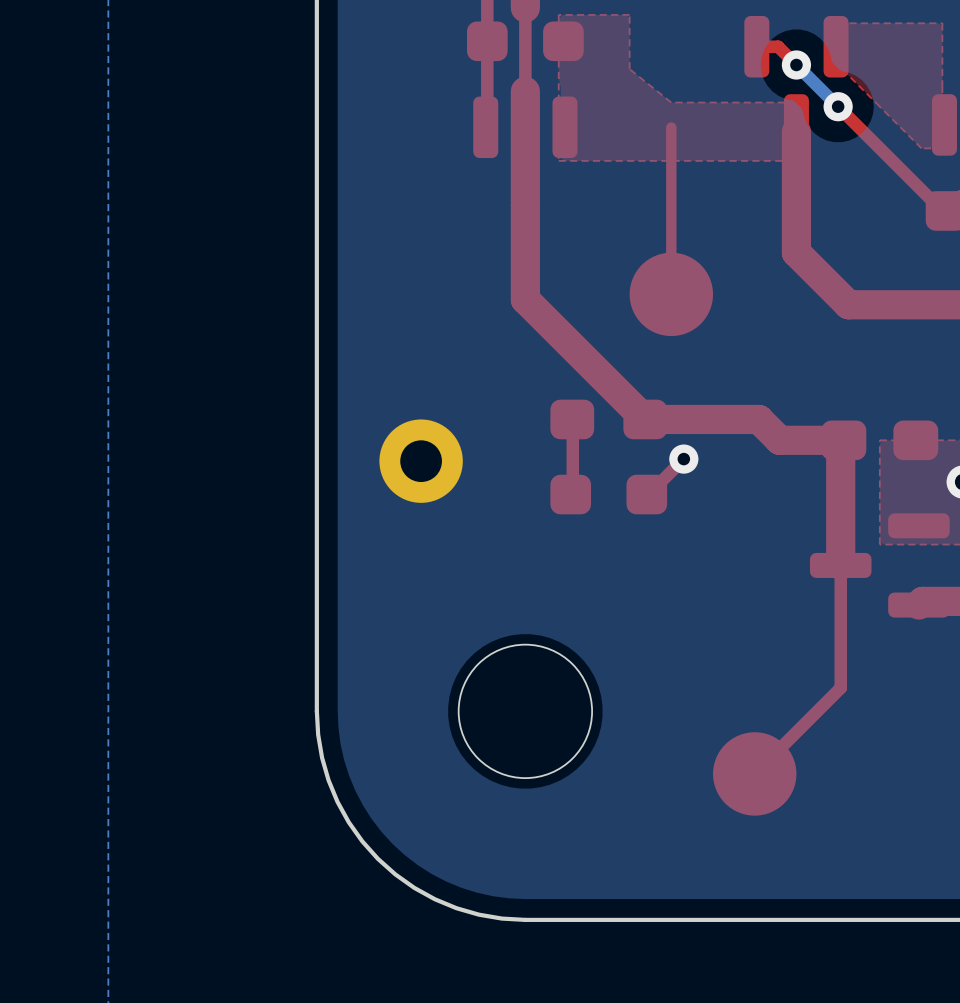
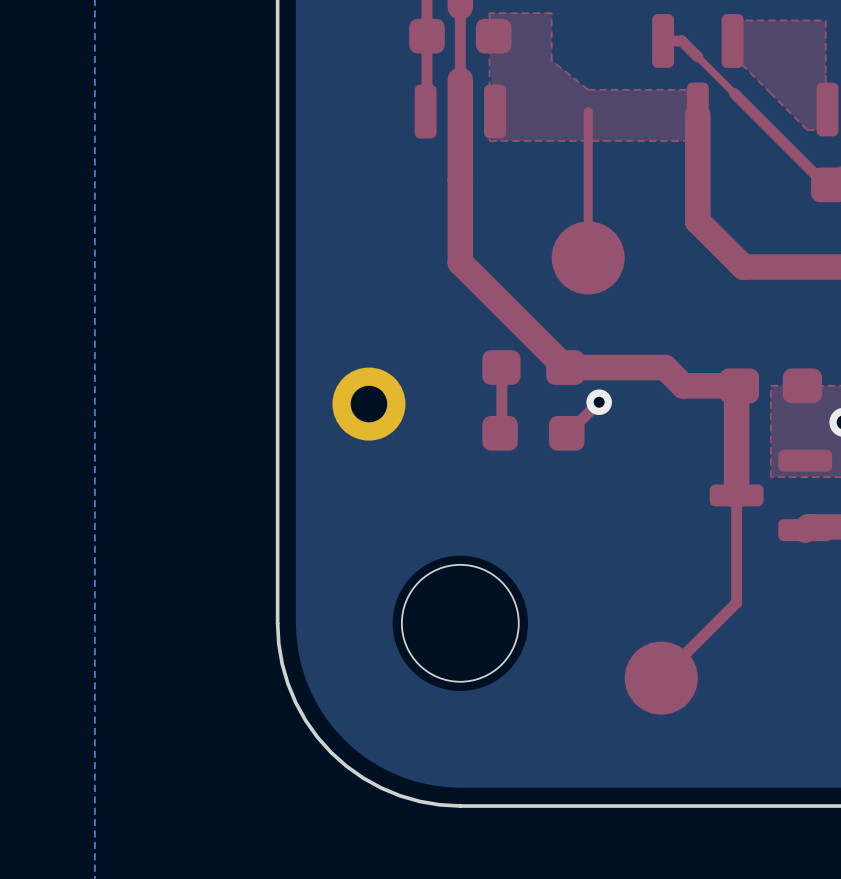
top track: none -> (697, 56) (734, 93)
bottom track: (796, 64) (838, 106) -> none
via: (796, 64) -> none
via: (838, 106) -> none

